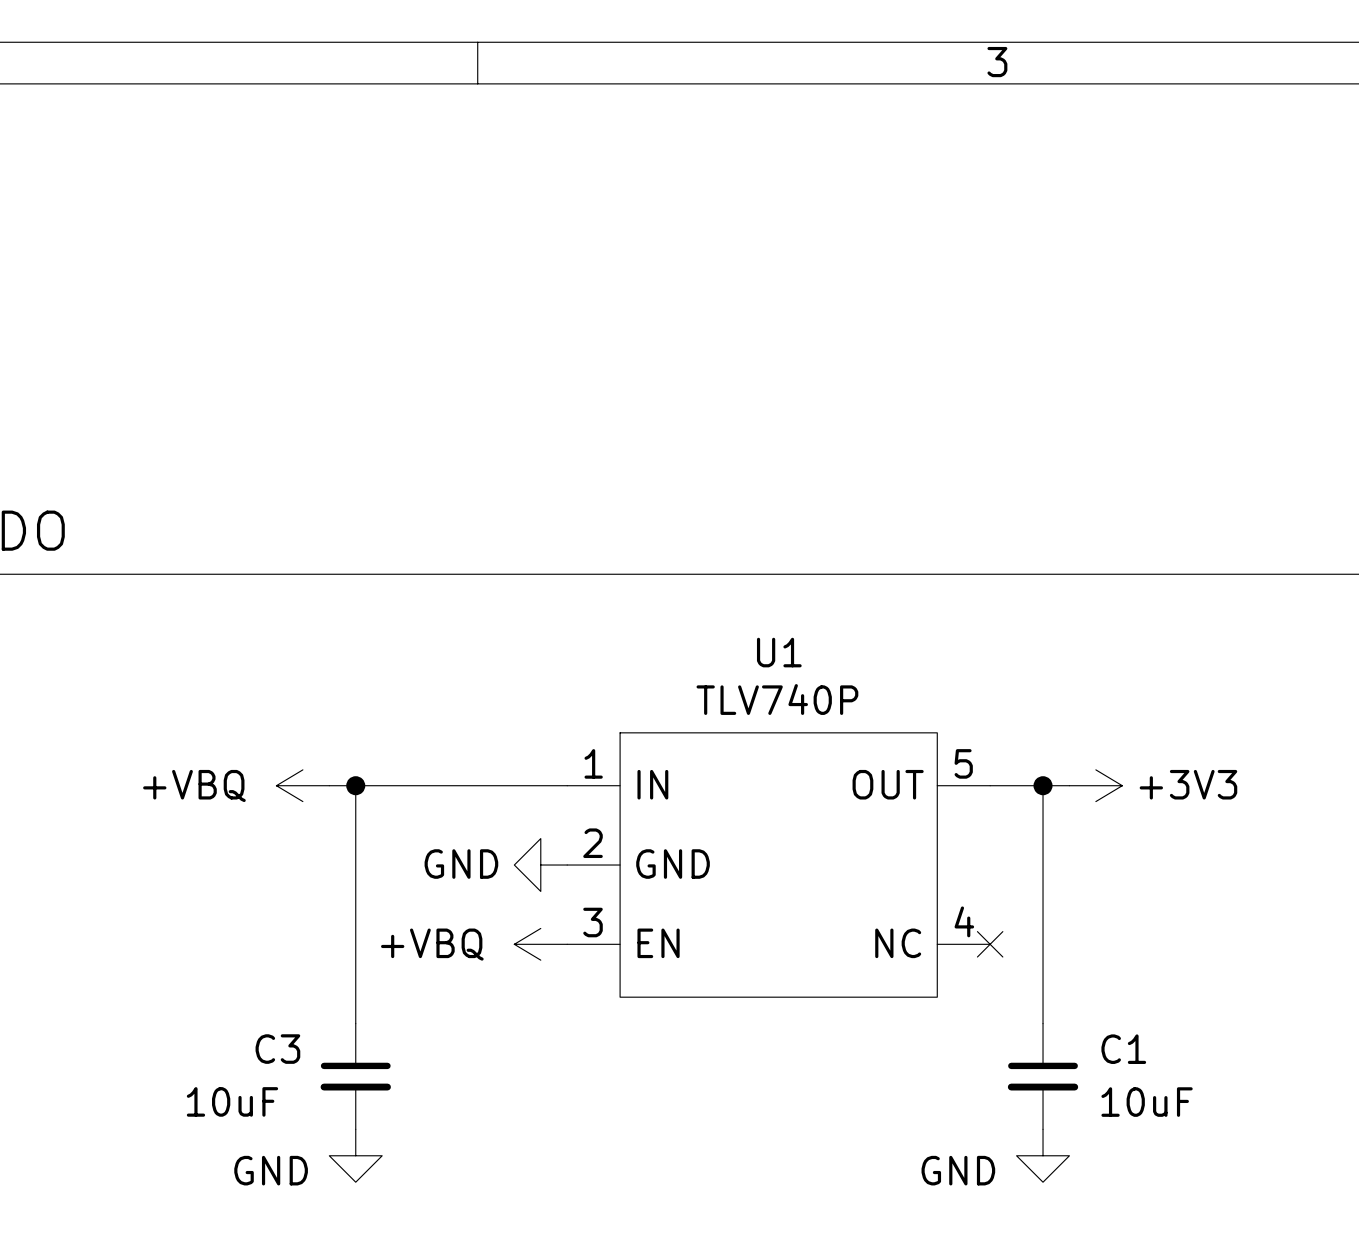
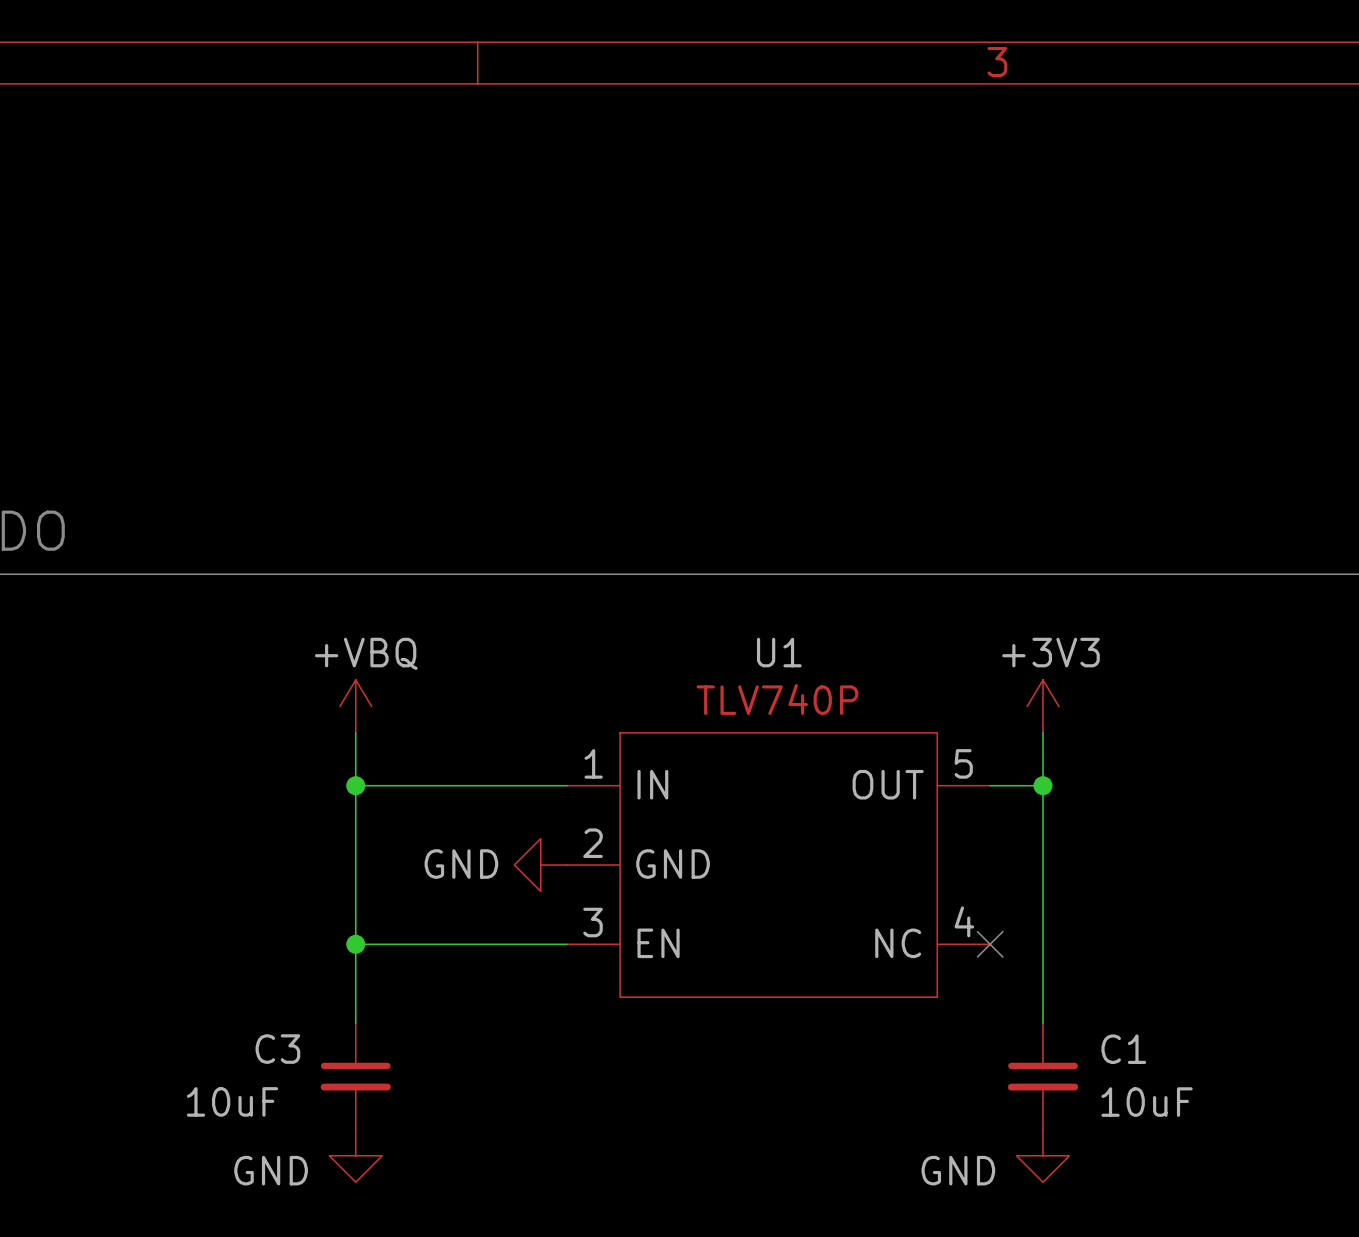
power symbol text position: +3V3 (1188, 784) -> +3V3 (1051, 652)
power symbol text position: +VBQ (194, 785) -> +VBQ (366, 653)
power symbol rotation: 0° (302, 785) -> 90° clockwise (355, 706)
power symbol position: +VBQ (302, 785) -> +VBQ (355, 706)
wire: (329, 785) (355, 785) -> (355, 732) (355, 785)
wire: (1043, 785) (1069, 785) -> (1043, 785) (1043, 732)
power symbol rotation: 0° (1095, 785) -> 90° counterclockwise (1043, 706)
power symbol position: +3V3 (1095, 785) -> +3V3 (1043, 706)
wire: none -> (355, 944) (567, 944)
junction: none -> (355, 944)
power symbol: +VBQ (540, 944) -> none

